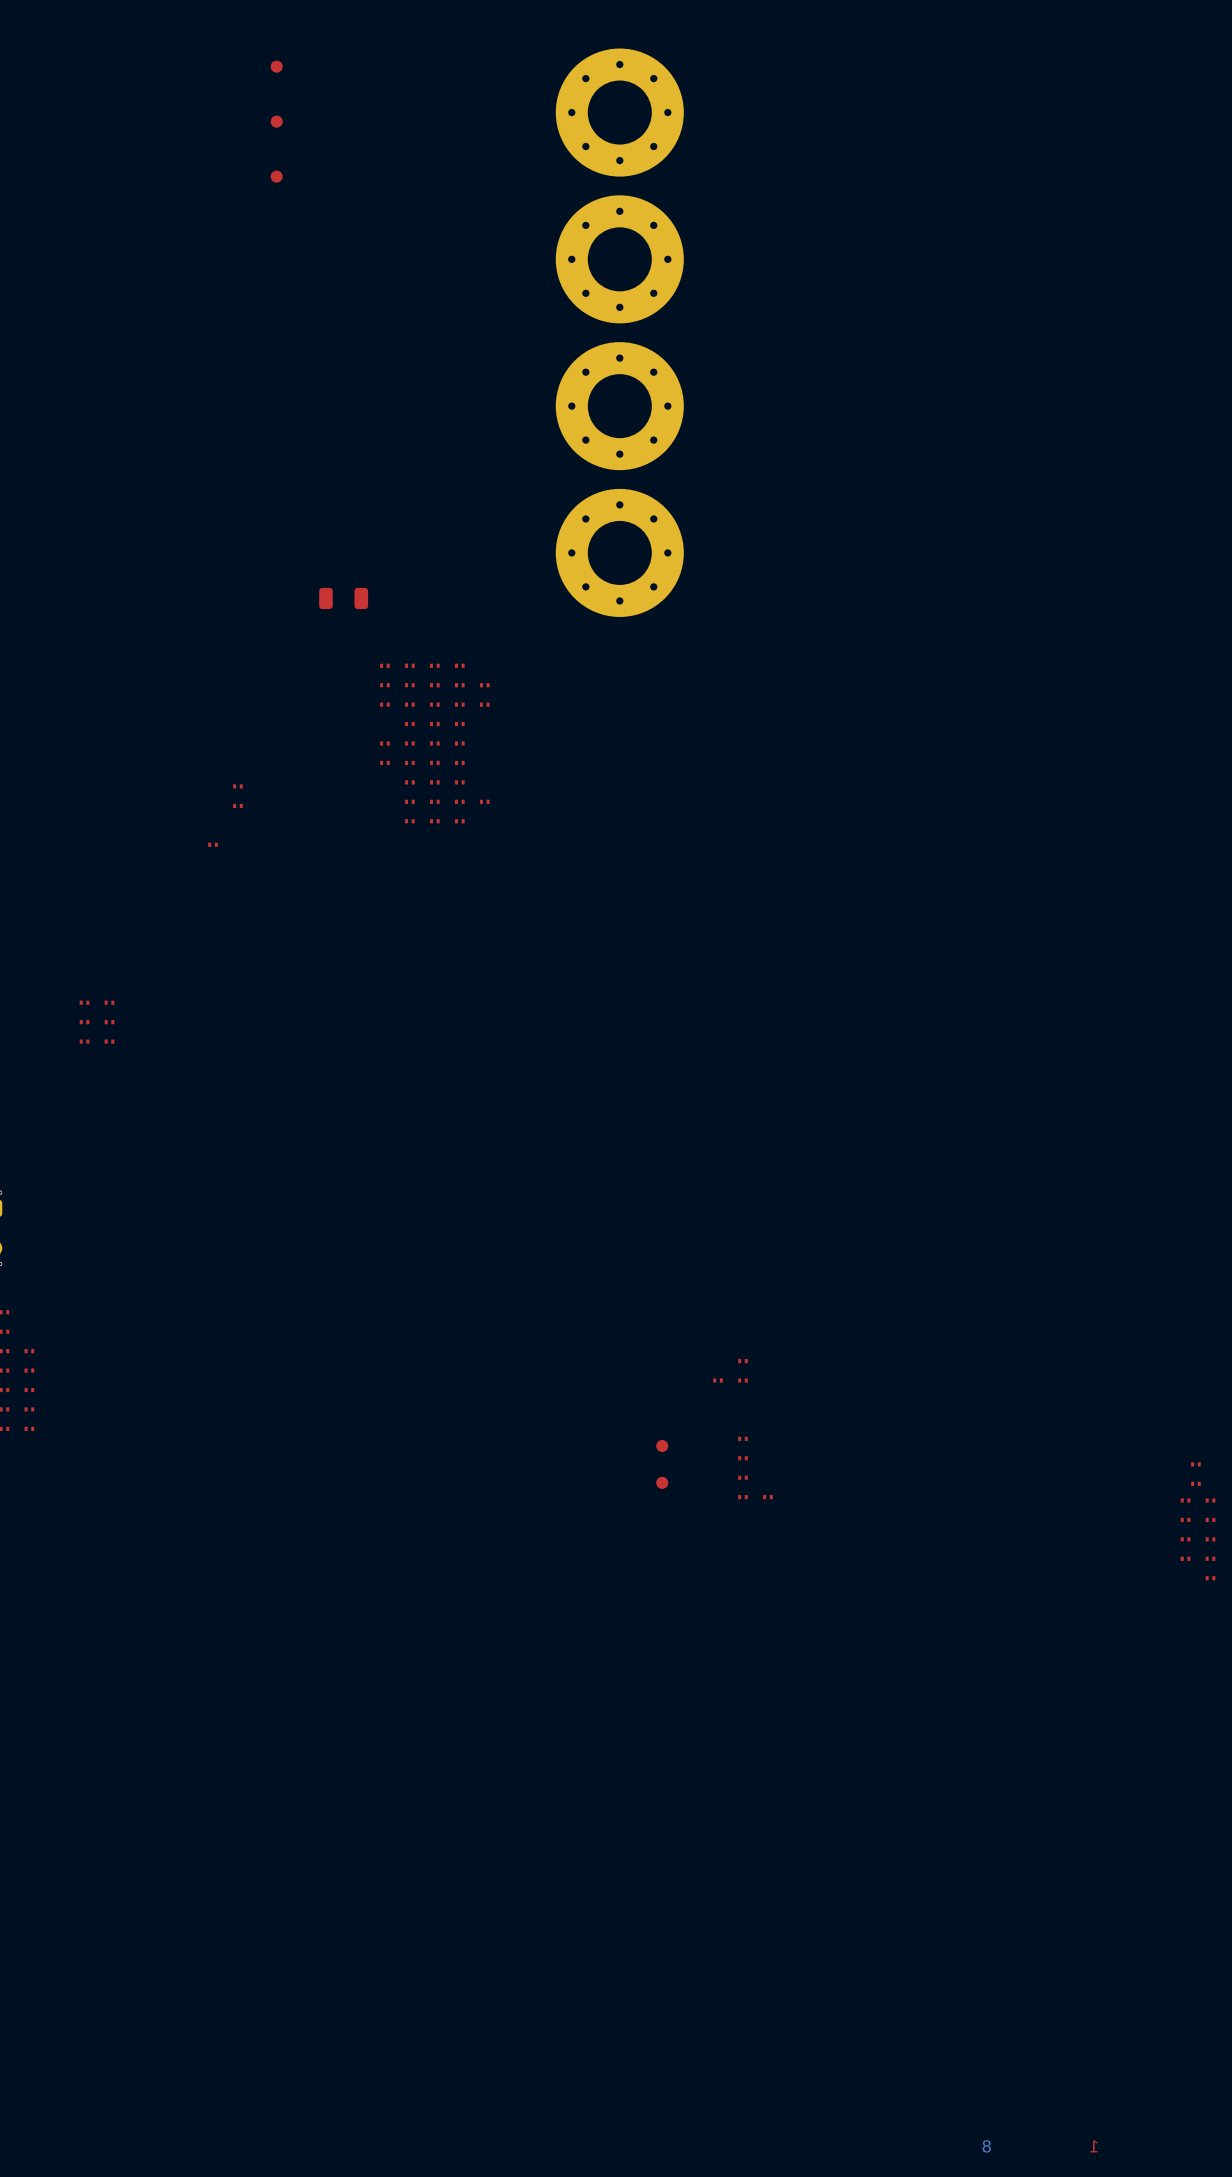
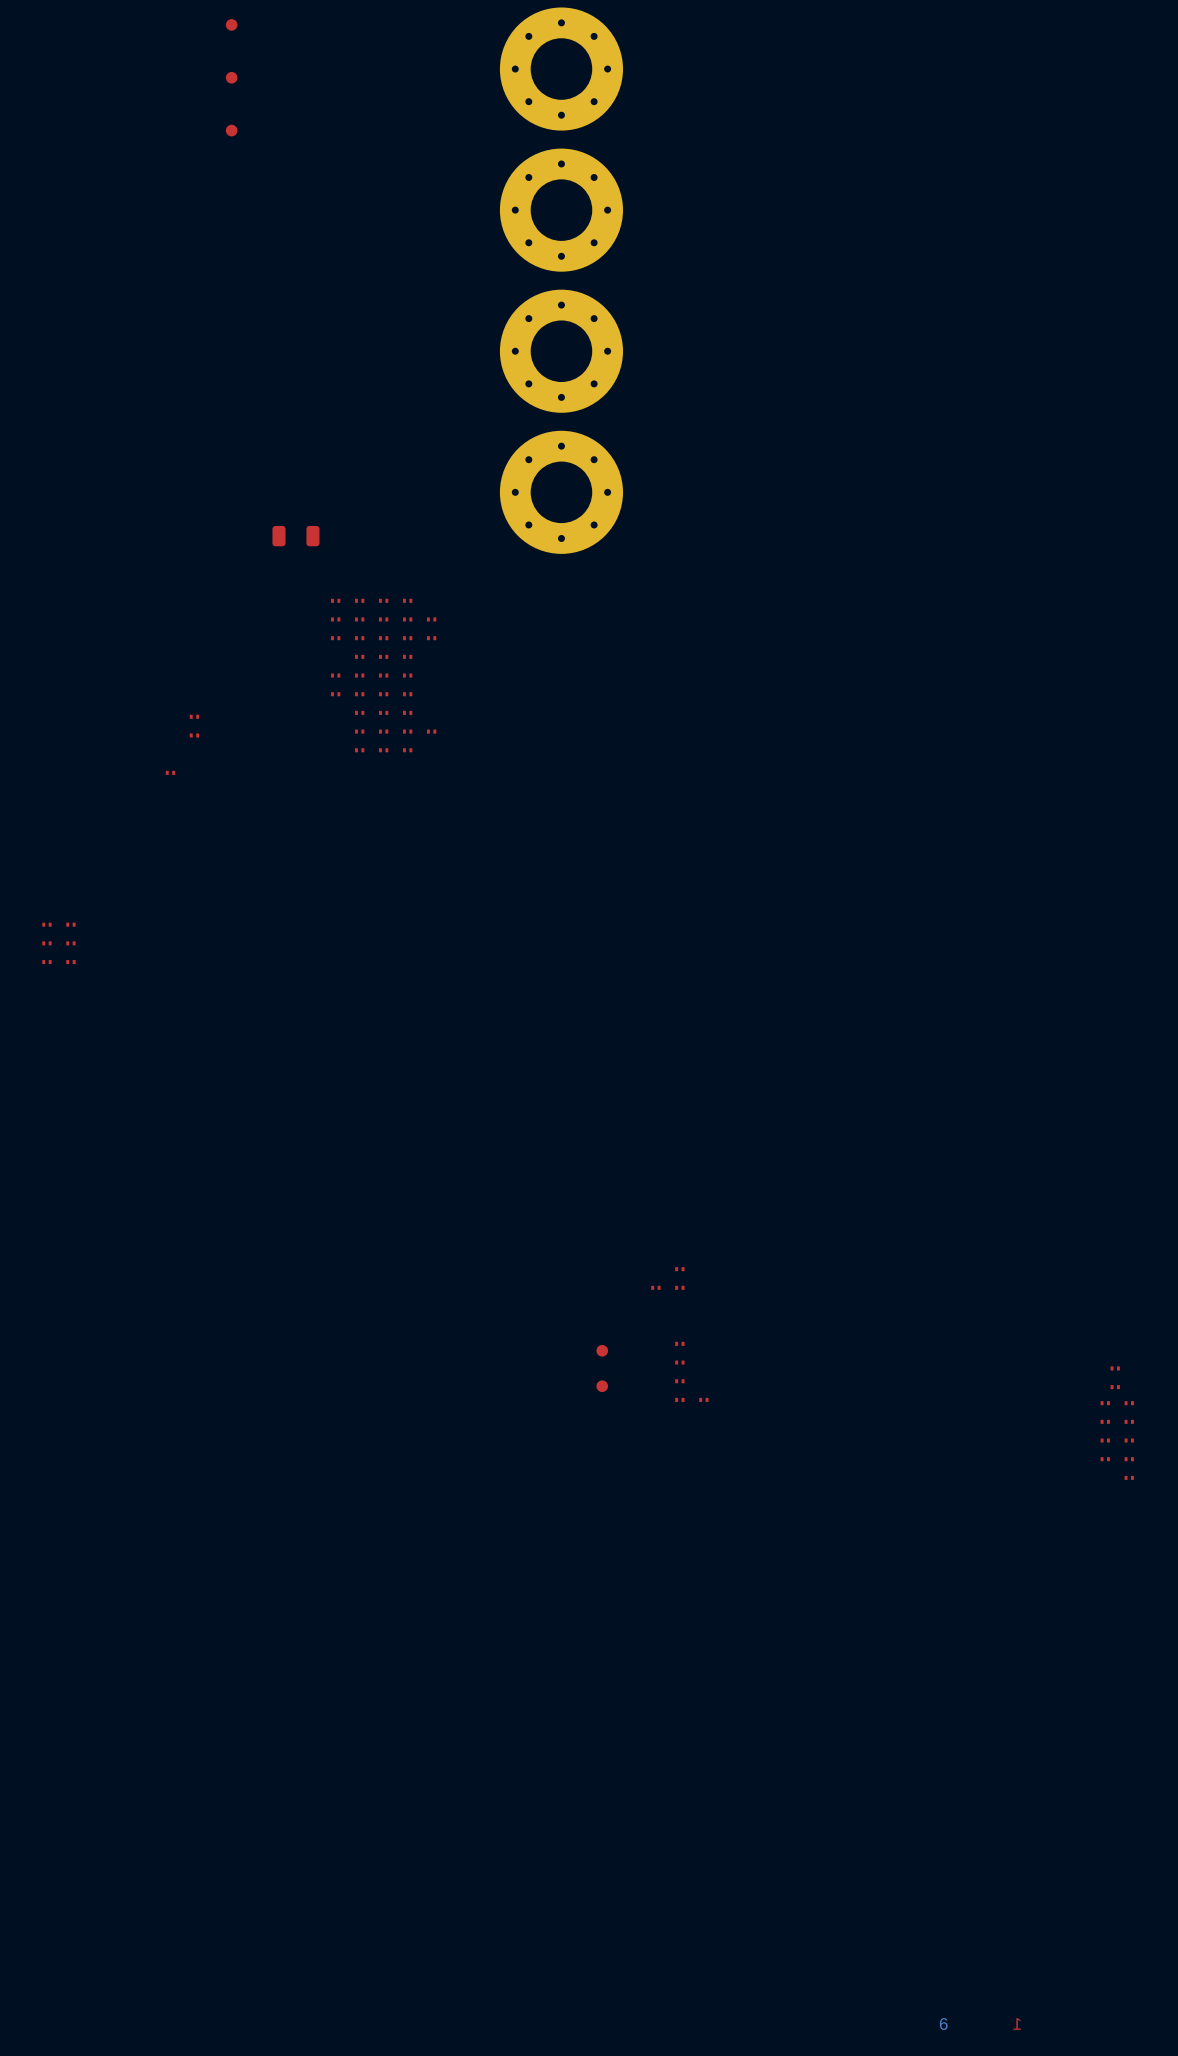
drawing: [982, 2140, 1098, 2153] -> none
drawing: none -> [939, 2018, 1021, 2030]

